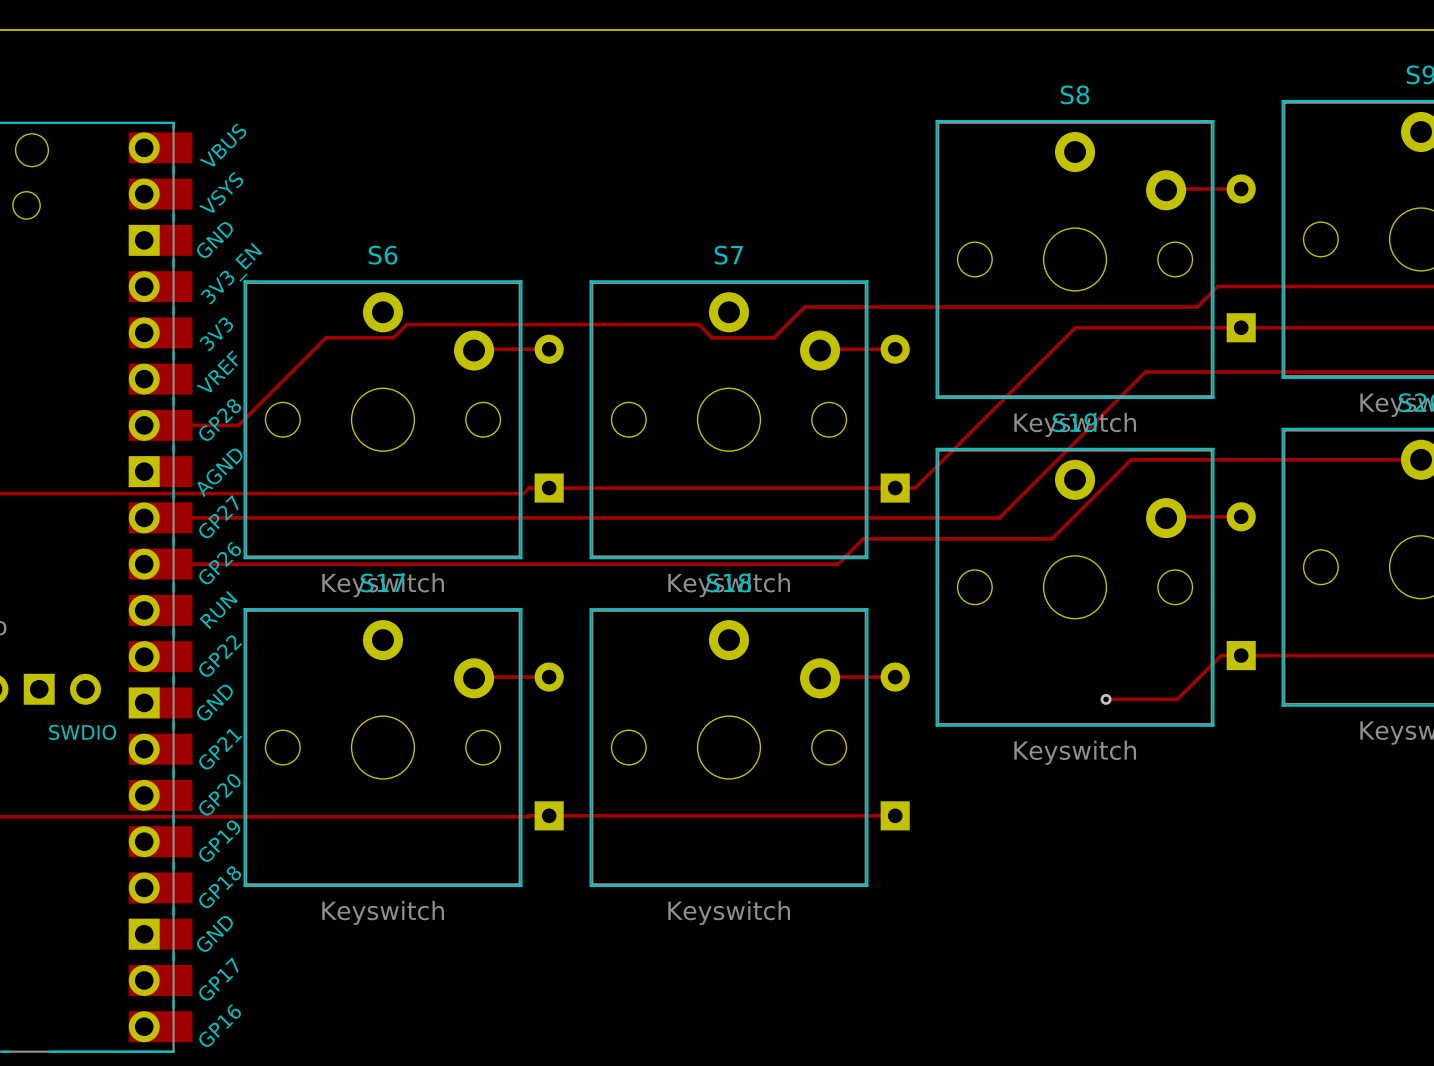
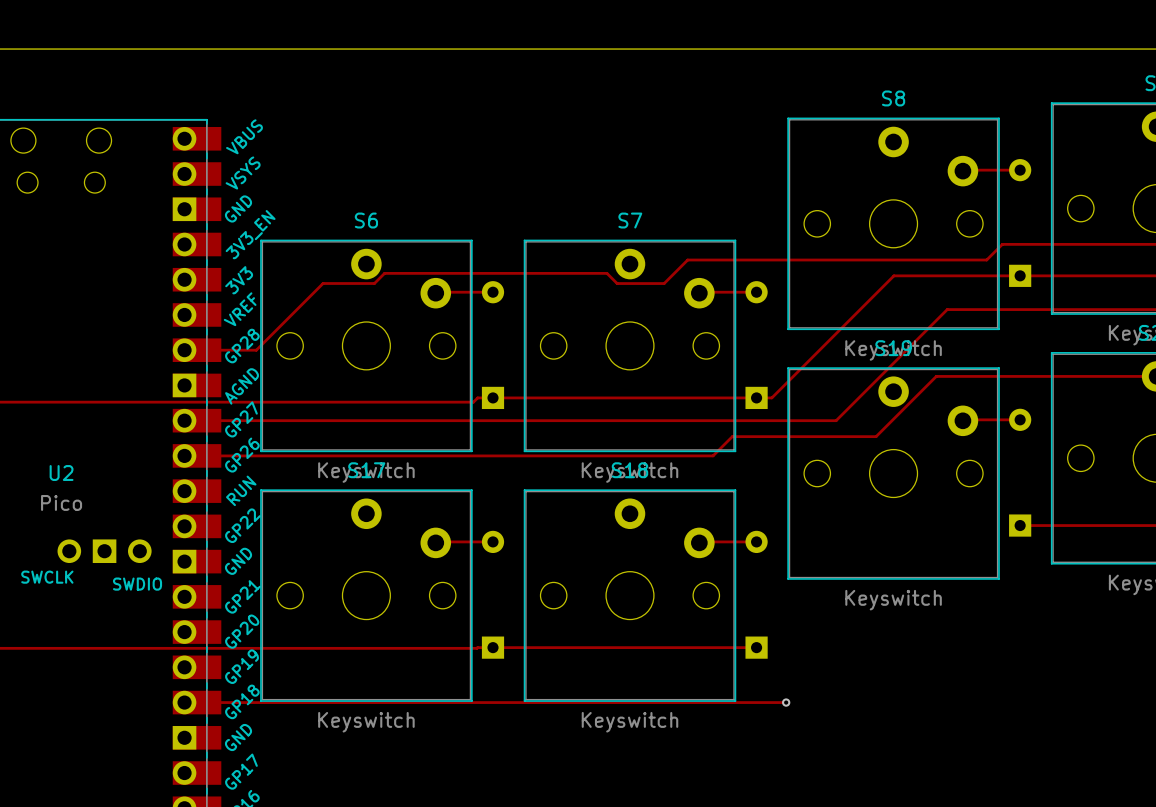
track: (1241, 655) (1221, 655) (1177, 699) (1106, 699) -> none
via: (1106, 699) -> none
track: none -> (184, 702) (786, 702)
via: none -> (786, 702)

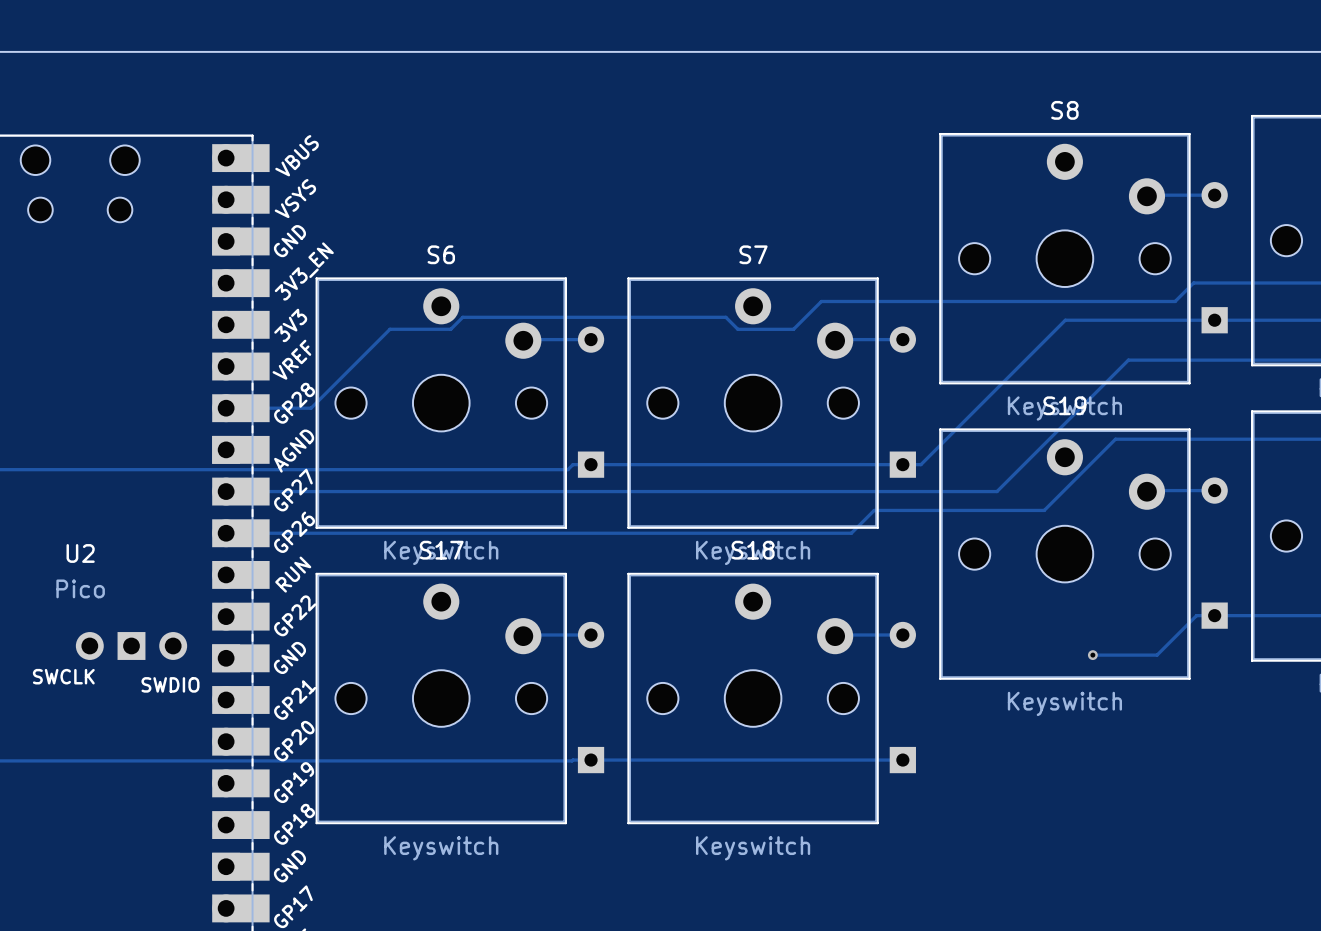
track: none -> (1214, 615) (1196, 615) (1157, 655) (1092, 655)
via: none -> (1092, 655)
track: (184, 702) (786, 702) -> none
via: (786, 702) -> none

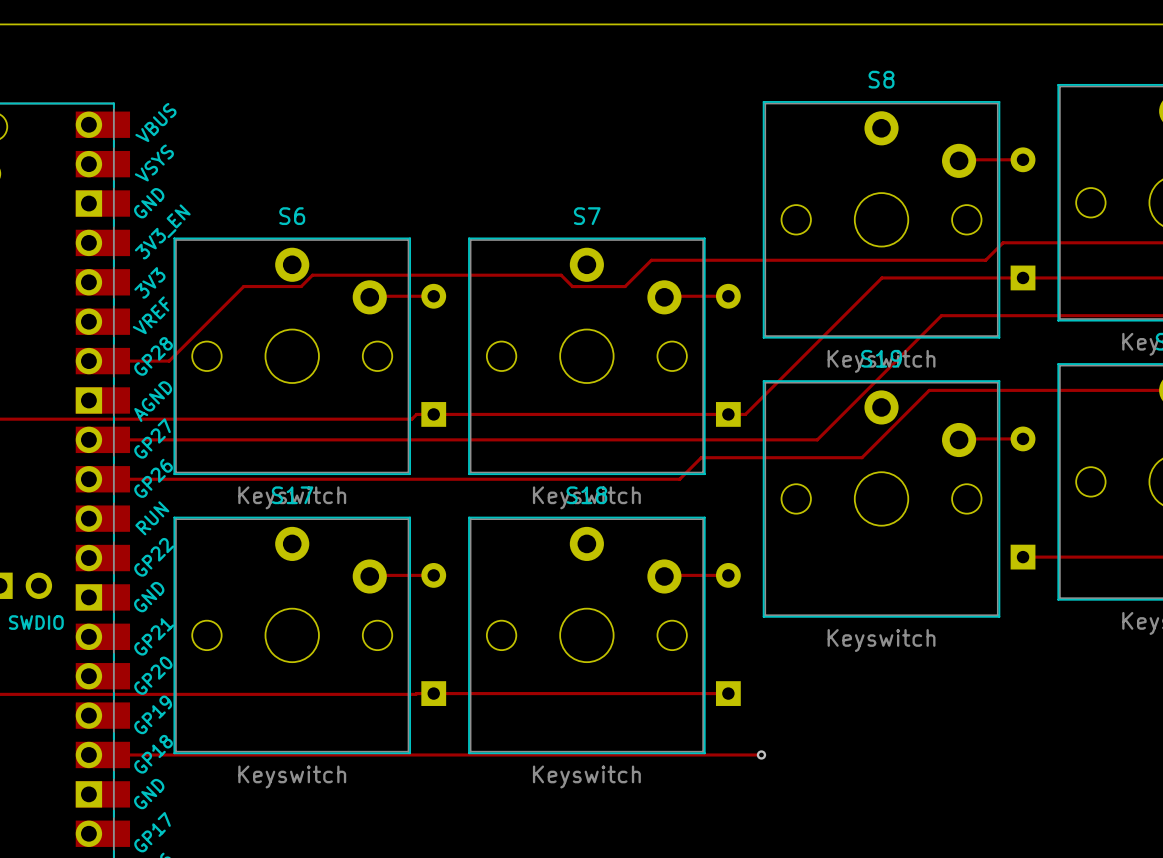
track: (1214, 615) (1196, 615) (1157, 655) (1092, 655) -> none
via: (1092, 655) -> none
track: none -> (88, 754) (761, 754)
via: none -> (761, 754)

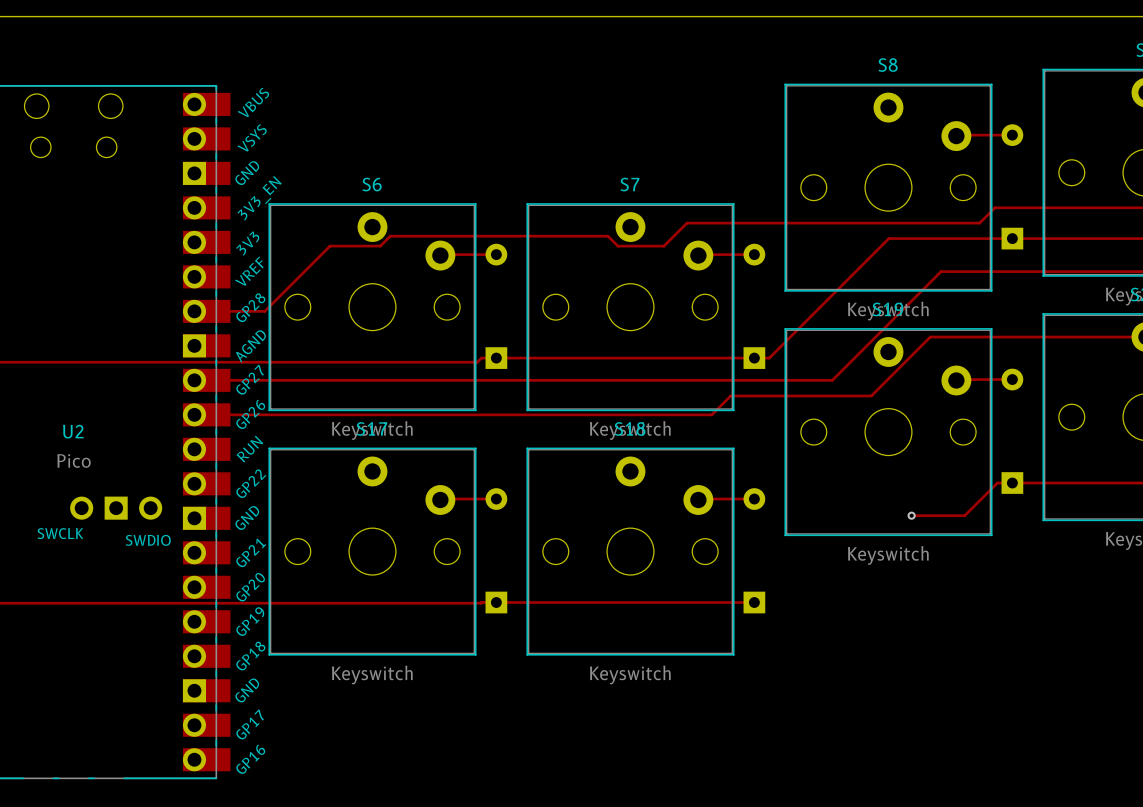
track: none -> (1012, 483) (997, 483) (964, 515) (911, 515)
via: none -> (911, 515)
track: (88, 754) (761, 754) -> none
via: (761, 754) -> none

